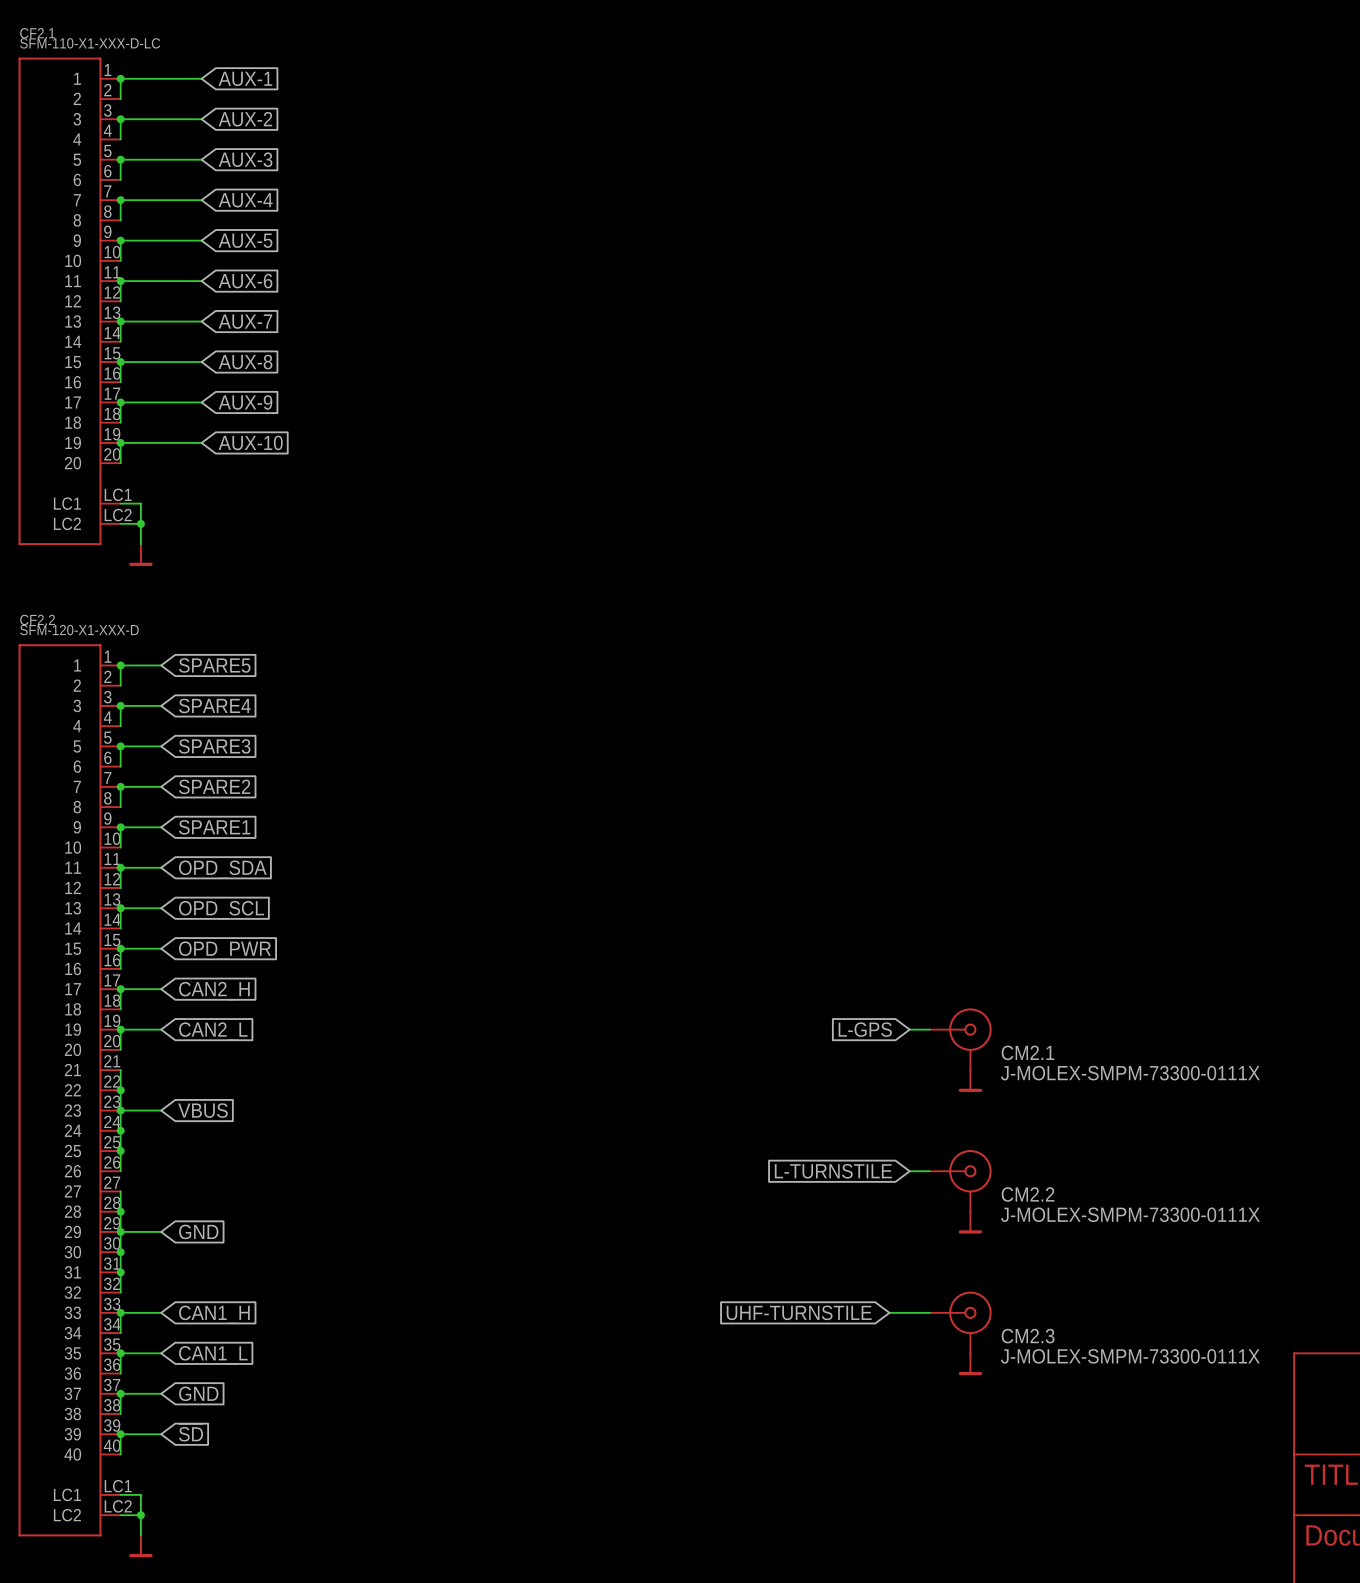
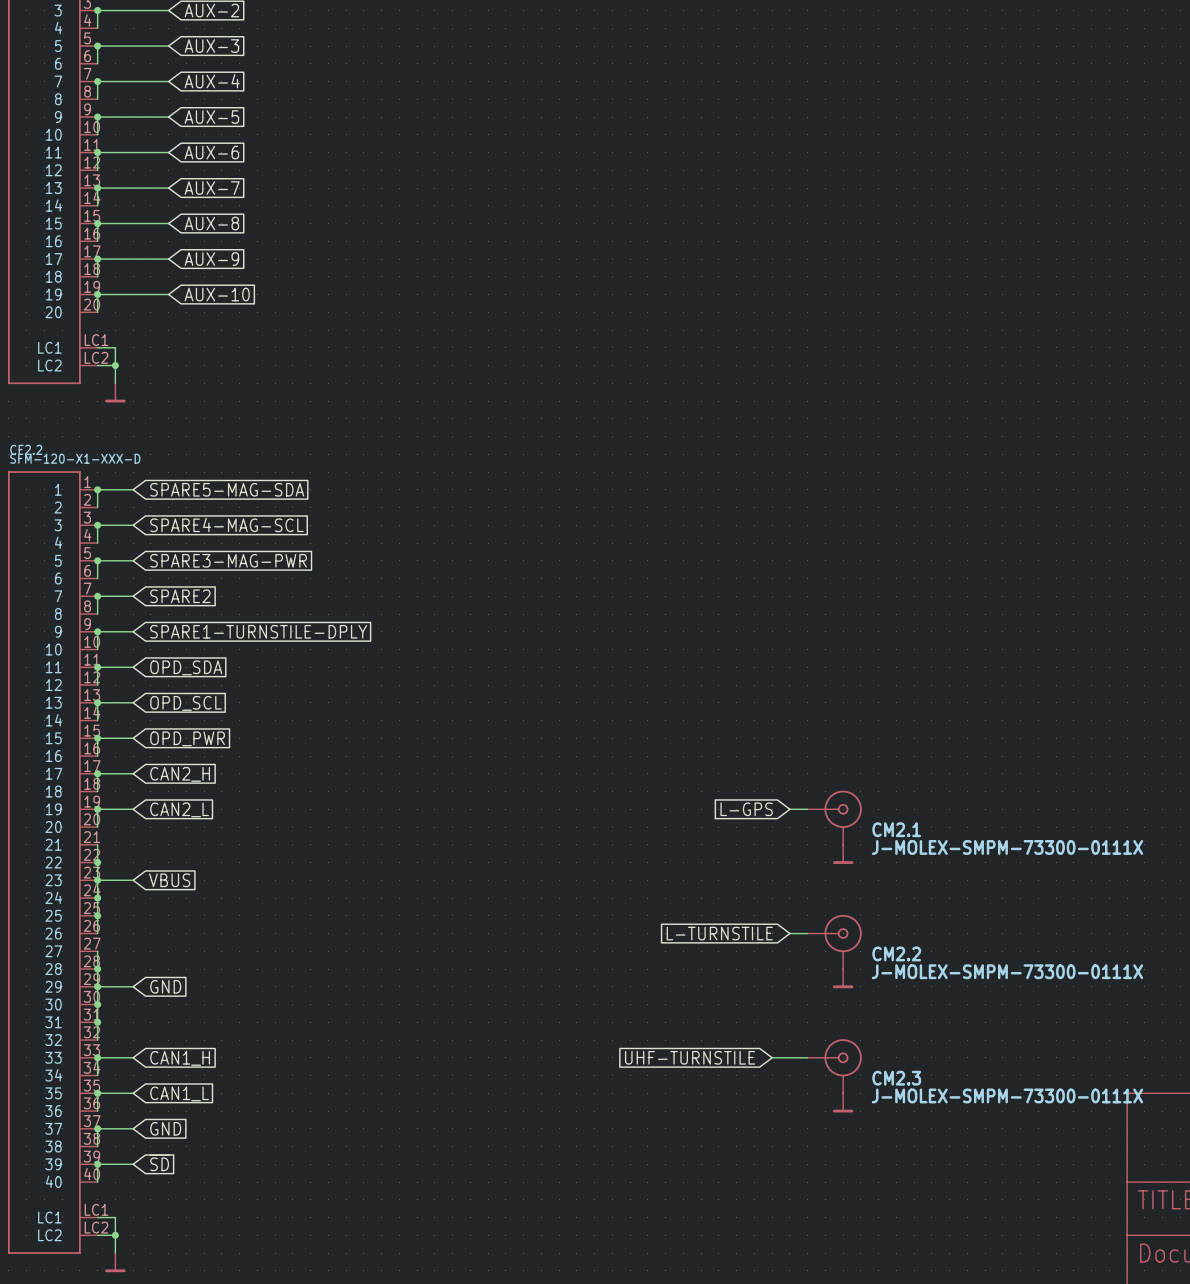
global label: SPARE5 (214, 665) -> SPARE5-MAG-SDA (227, 489)
global label: SPARE4 (214, 705) -> SPARE4-MAG-SCL (226, 524)
global label: SPARE3 (214, 746) -> SPARE3-MAG-PWR (228, 560)
global label: SPARE1 (214, 827) -> SPARE1-TURNSTILE-DPLY (258, 631)

